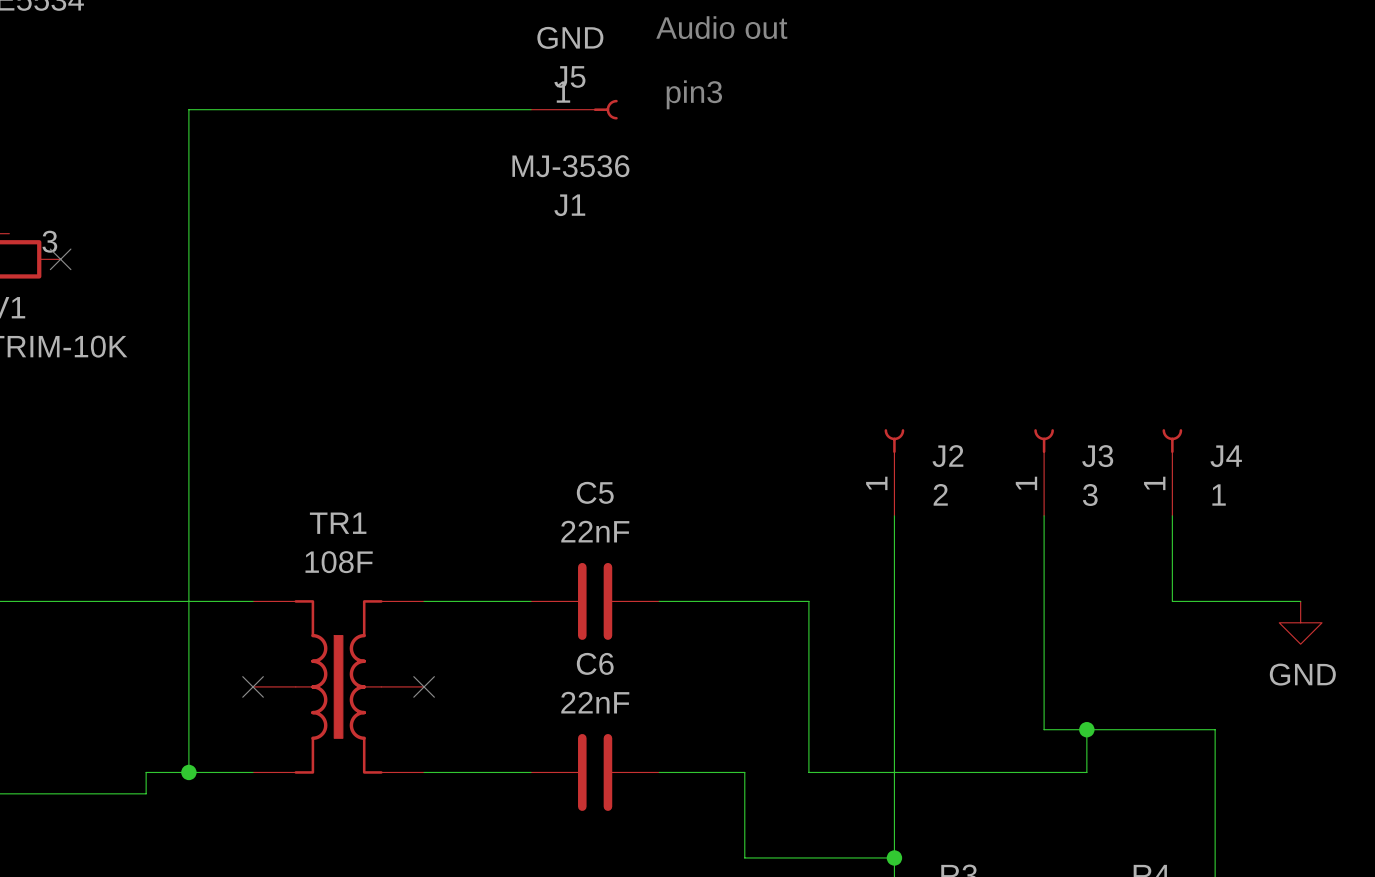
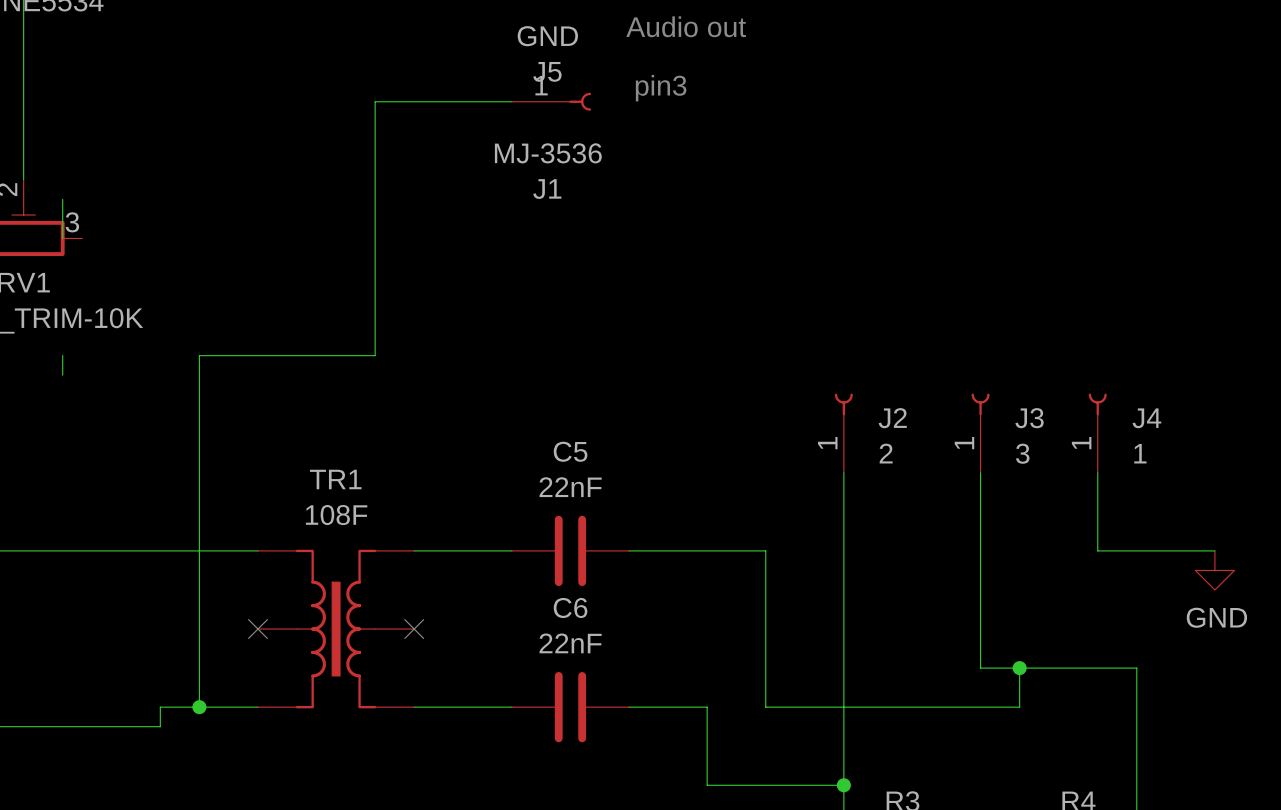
wire: (381, 109) (188, 109) (188, 387) -> (375, 101) (375, 355) (199, 355)
wire: none -> (62, 199) (62, 238)
no-connect mark: (60, 259) -> none
wire: none -> (62, 355) (62, 375)

